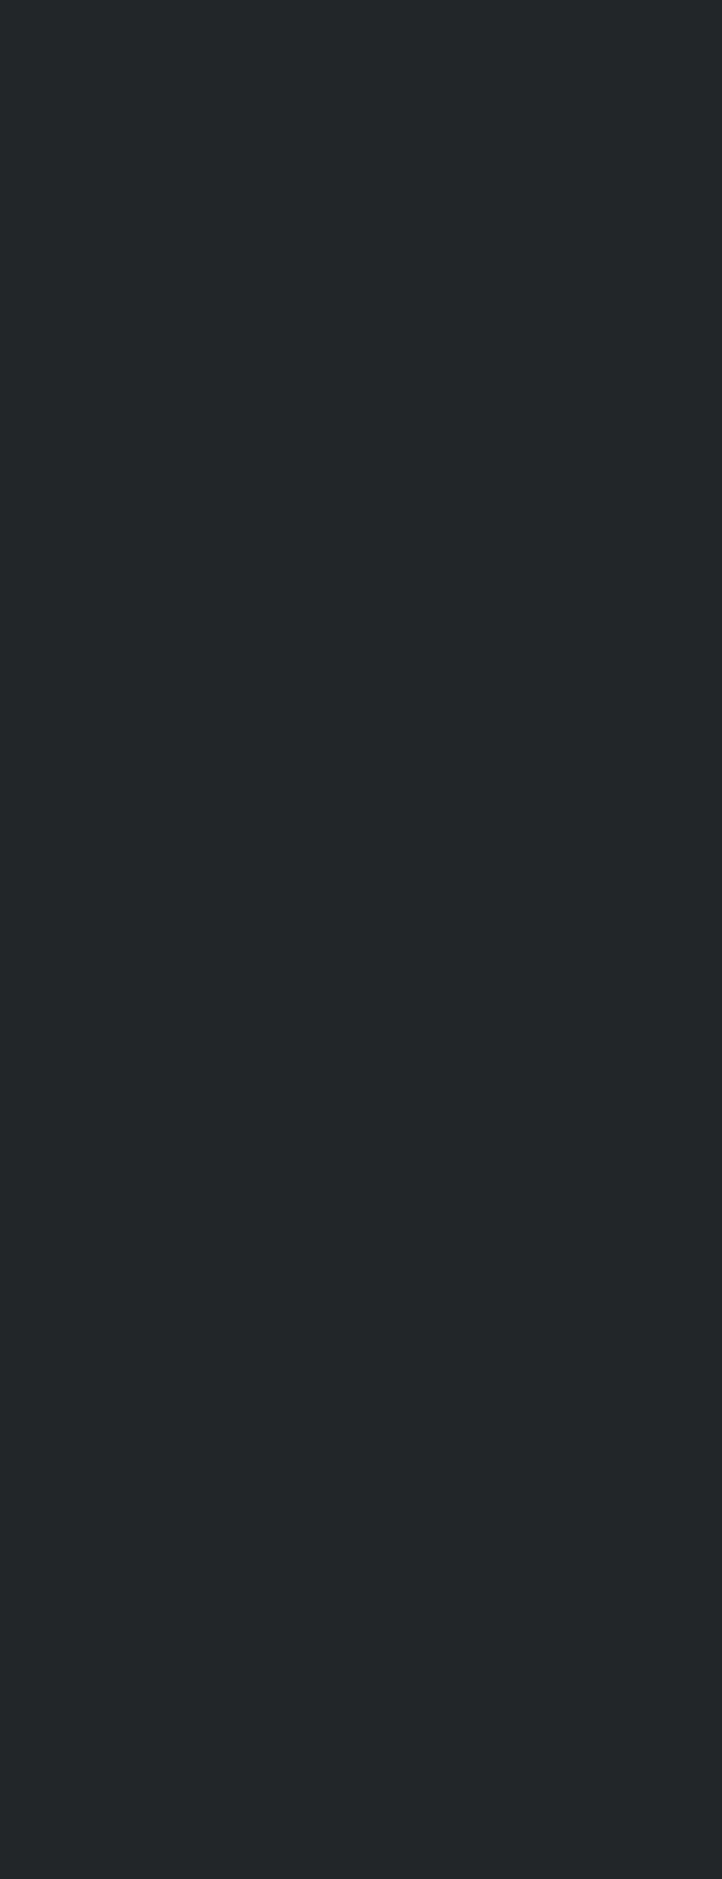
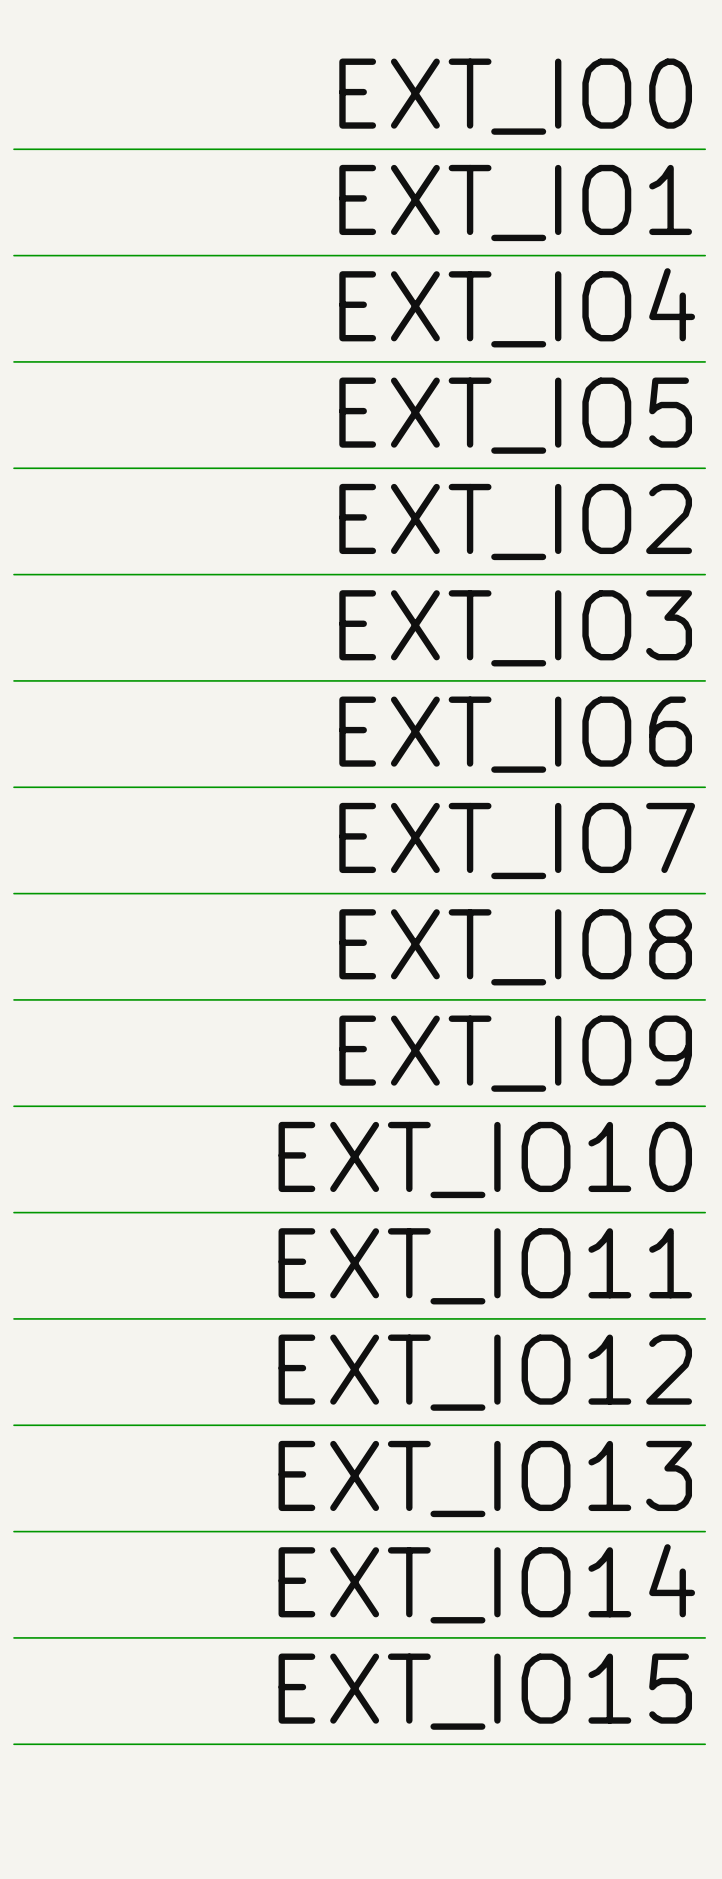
label: none -> EXT_IO0 (515, 96)
wire: none -> (14, 149) (705, 149)
label: none -> EXT_IO1 (515, 202)
wire: none -> (14, 255) (705, 255)
label: none -> EXT_IO4 (517, 307)
wire: none -> (14, 361) (705, 361)
label: none -> EXT_IO5 (515, 415)
wire: none -> (14, 468) (705, 468)
label: none -> EXT_IO2 (515, 521)
wire: none -> (14, 574) (705, 574)
label: none -> EXT_IO3 (515, 628)
wire: none -> (14, 680) (705, 680)
label: none -> EXT_IO6 (515, 734)
wire: none -> (14, 787) (705, 787)
label: none -> EXT_IO7 (517, 840)
wire: none -> (14, 893) (705, 893)
label: none -> EXT_IO8 (515, 947)
wire: none -> (14, 999) (705, 999)
label: none -> EXT_IO9 (515, 1053)
wire: none -> (14, 1106) (705, 1106)
label: none -> EXT_IO10 (485, 1159)
wire: none -> (14, 1212) (705, 1212)
label: none -> EXT_IO11 (485, 1266)
wire: none -> (14, 1318) (705, 1318)
label: none -> EXT_IO12 (485, 1372)
wire: none -> (14, 1425) (705, 1425)
label: none -> EXT_IO13 (485, 1478)
wire: none -> (14, 1531) (705, 1531)
label: none -> EXT_IO14 (486, 1583)
wire: none -> (14, 1637) (705, 1637)
label: none -> EXT_IO15 (485, 1691)
wire: none -> (14, 1744) (705, 1744)

